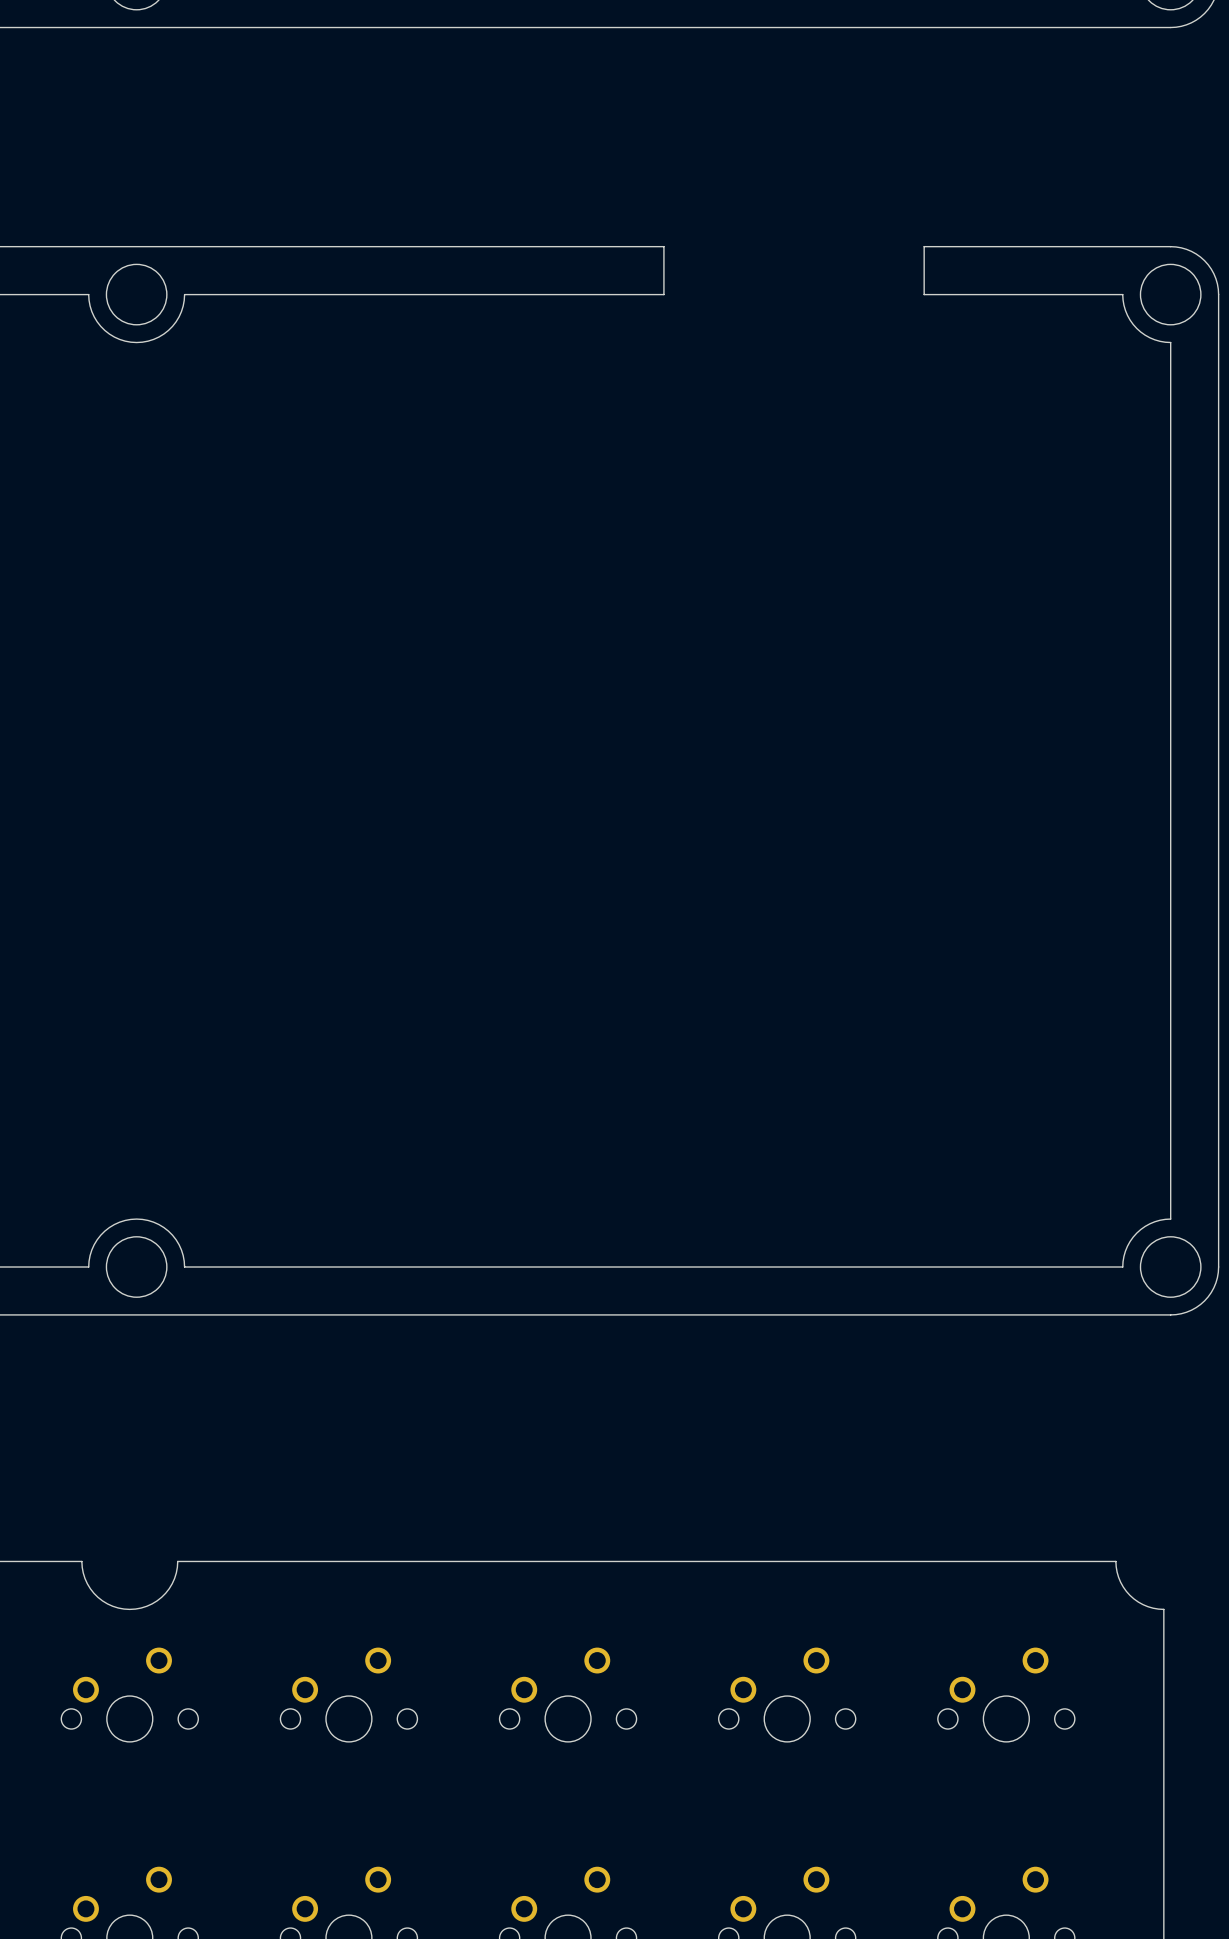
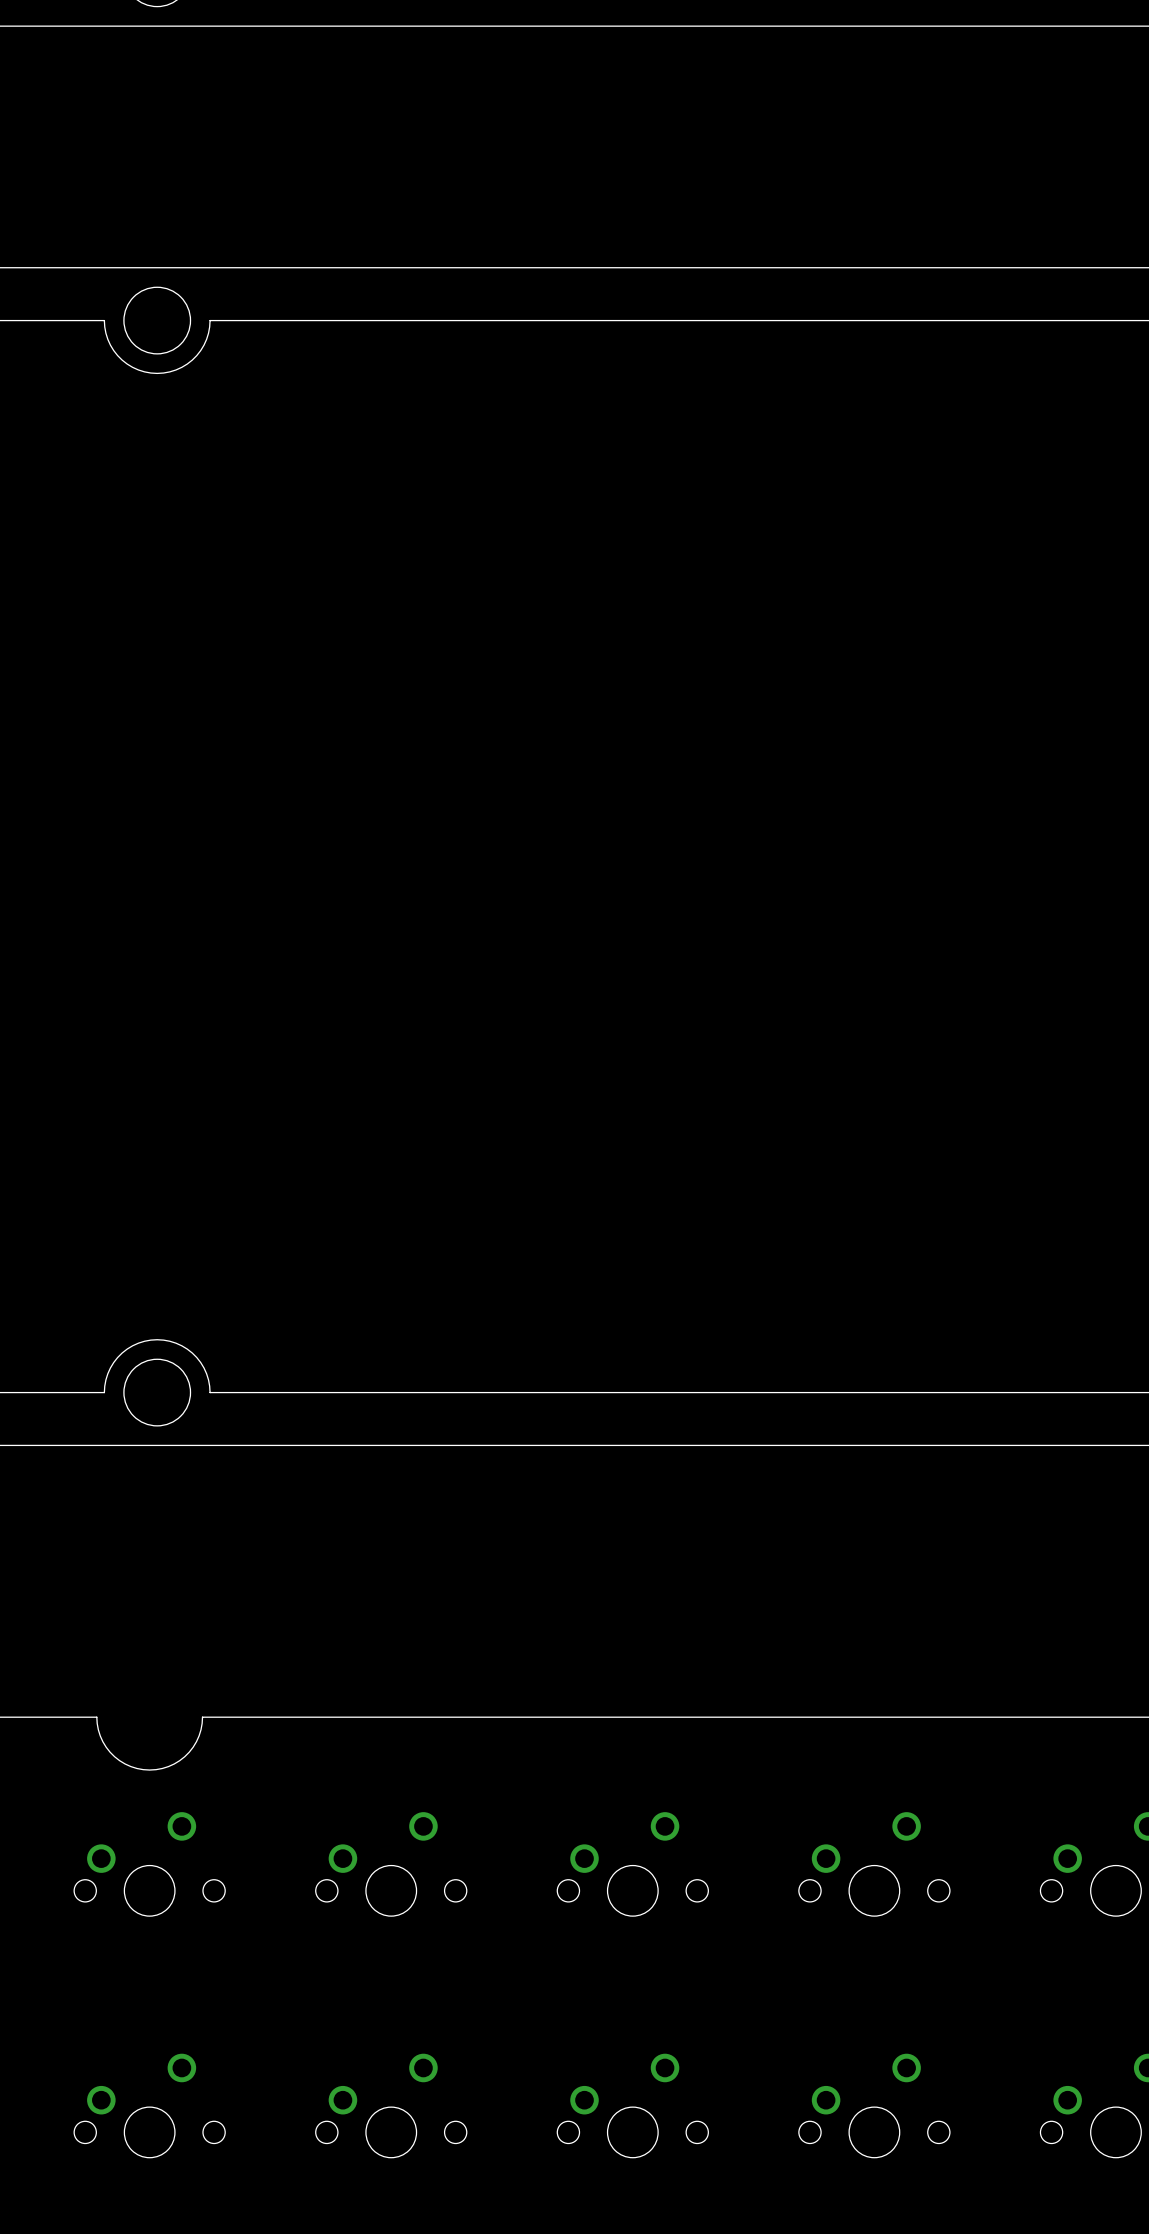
board edge: (663, 246) (663, 294) -> (738, 267) (1025, 267)
board edge: (924, 246) (924, 294) -> (738, 320) (1025, 320)

